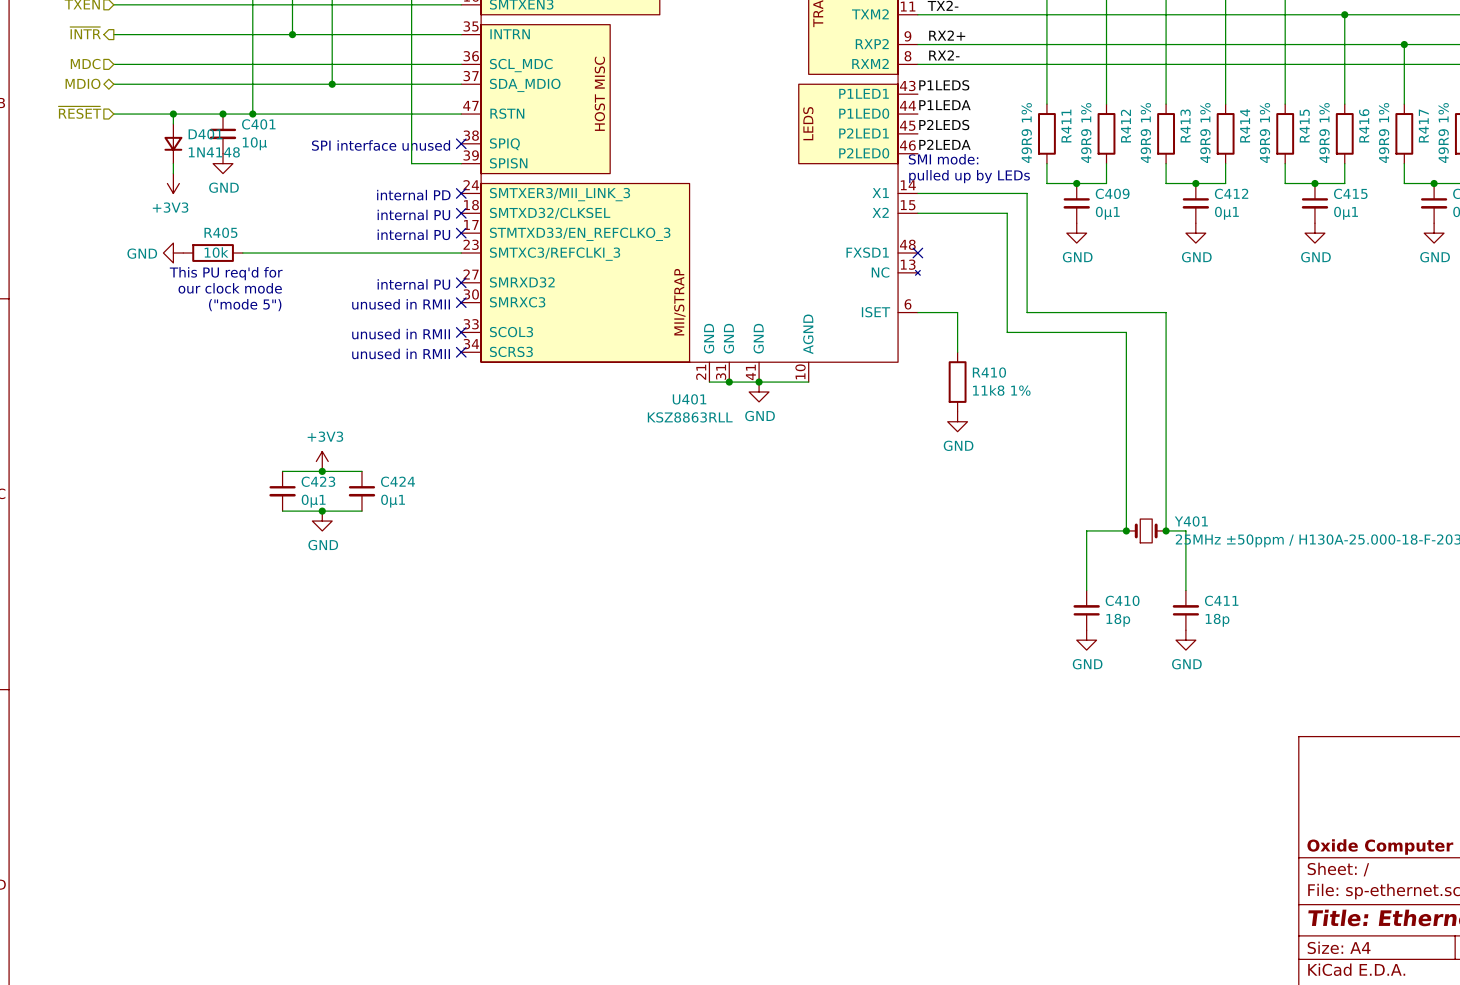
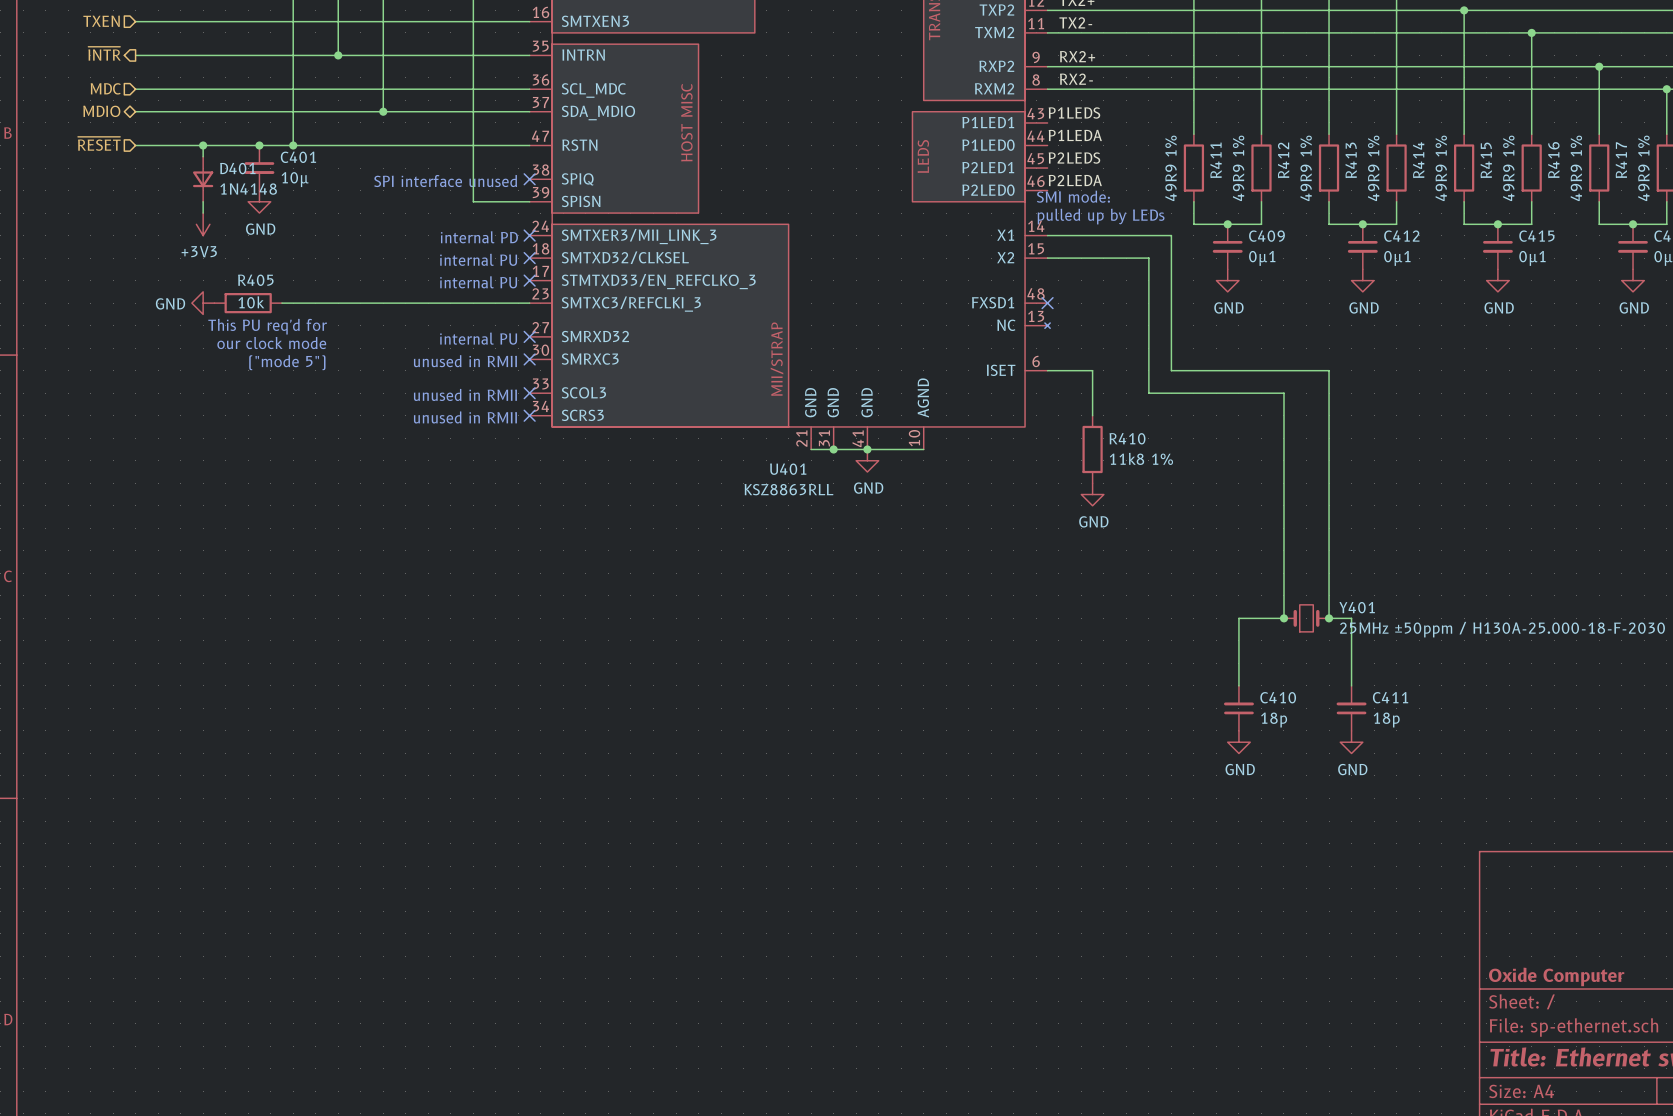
power symbol: +3V3 (322, 461) -> none
wire: (282, 471) (361, 471) -> none
junction: (322, 471) -> none
C423: 0µ1 (282, 491) -> none
C424: 0µ1 (361, 491) -> none
wire: (282, 511) (361, 511) -> none
junction: (322, 511) -> none
power symbol: GND (322, 521) -> none

